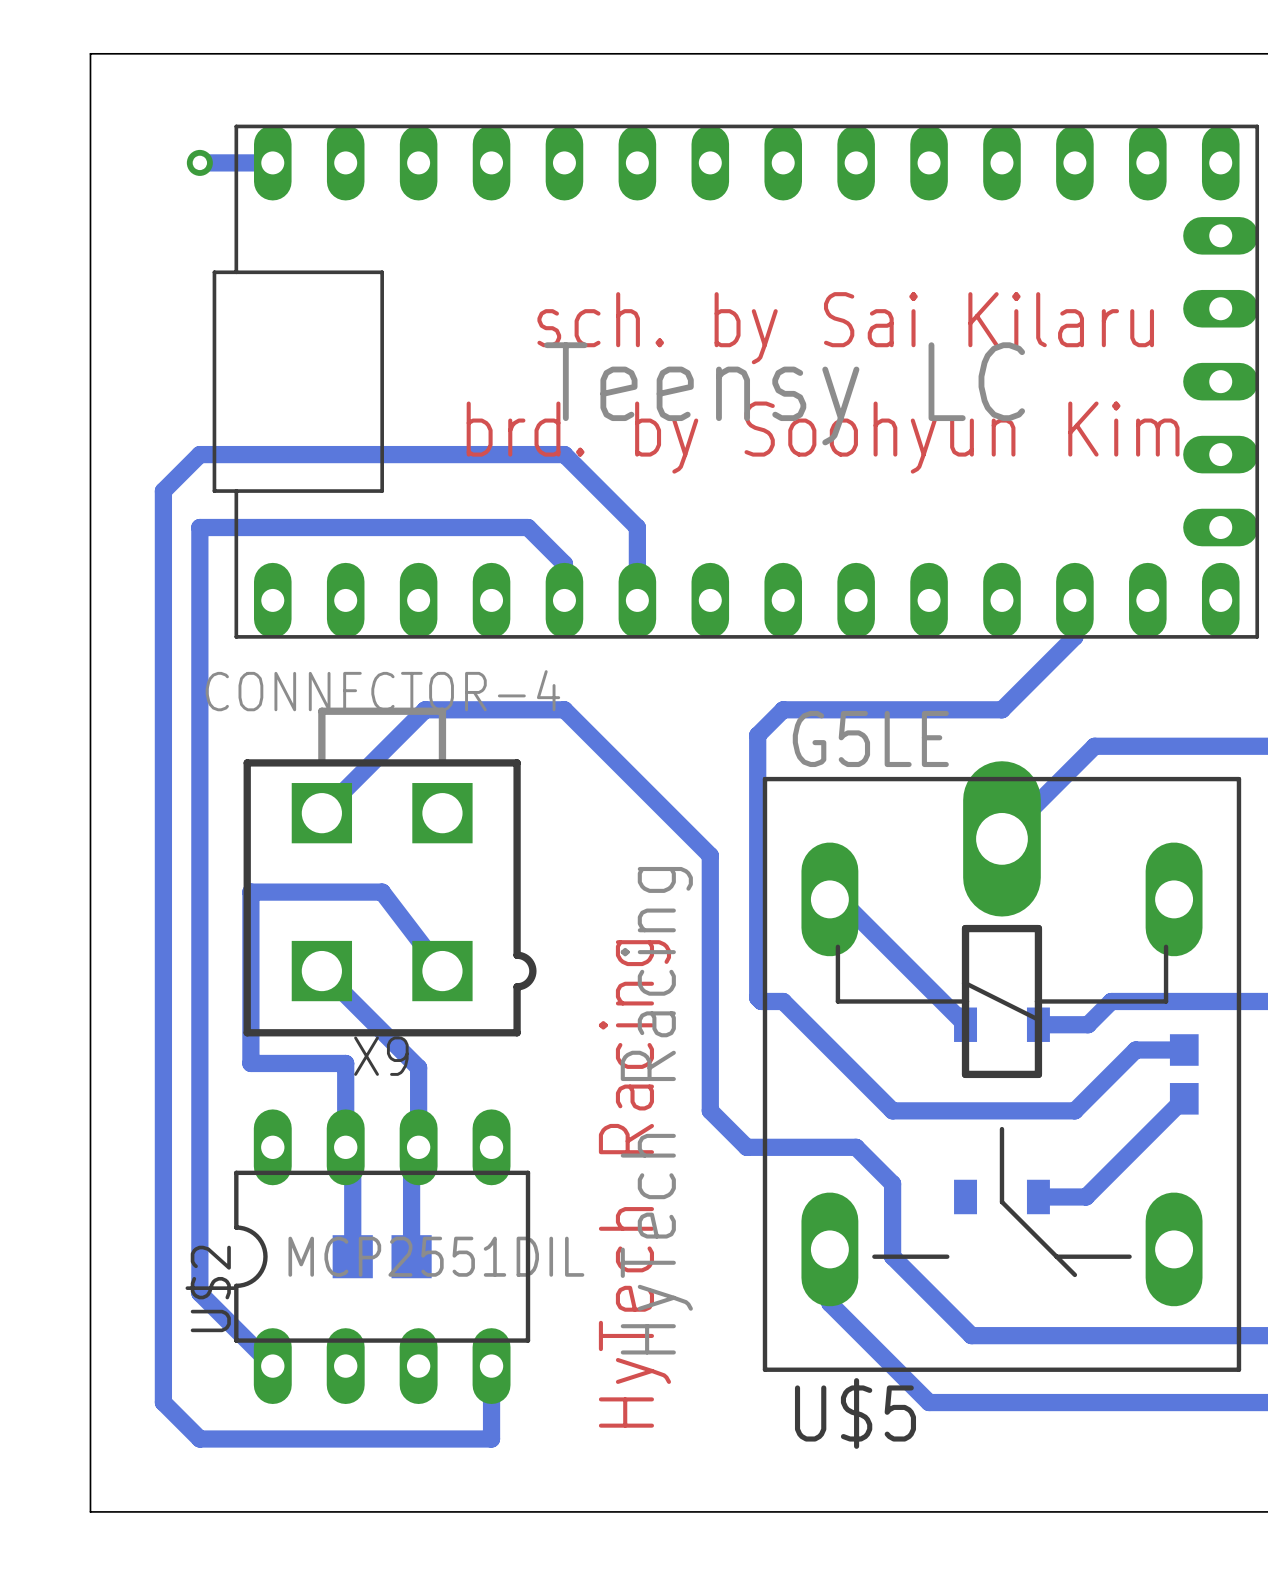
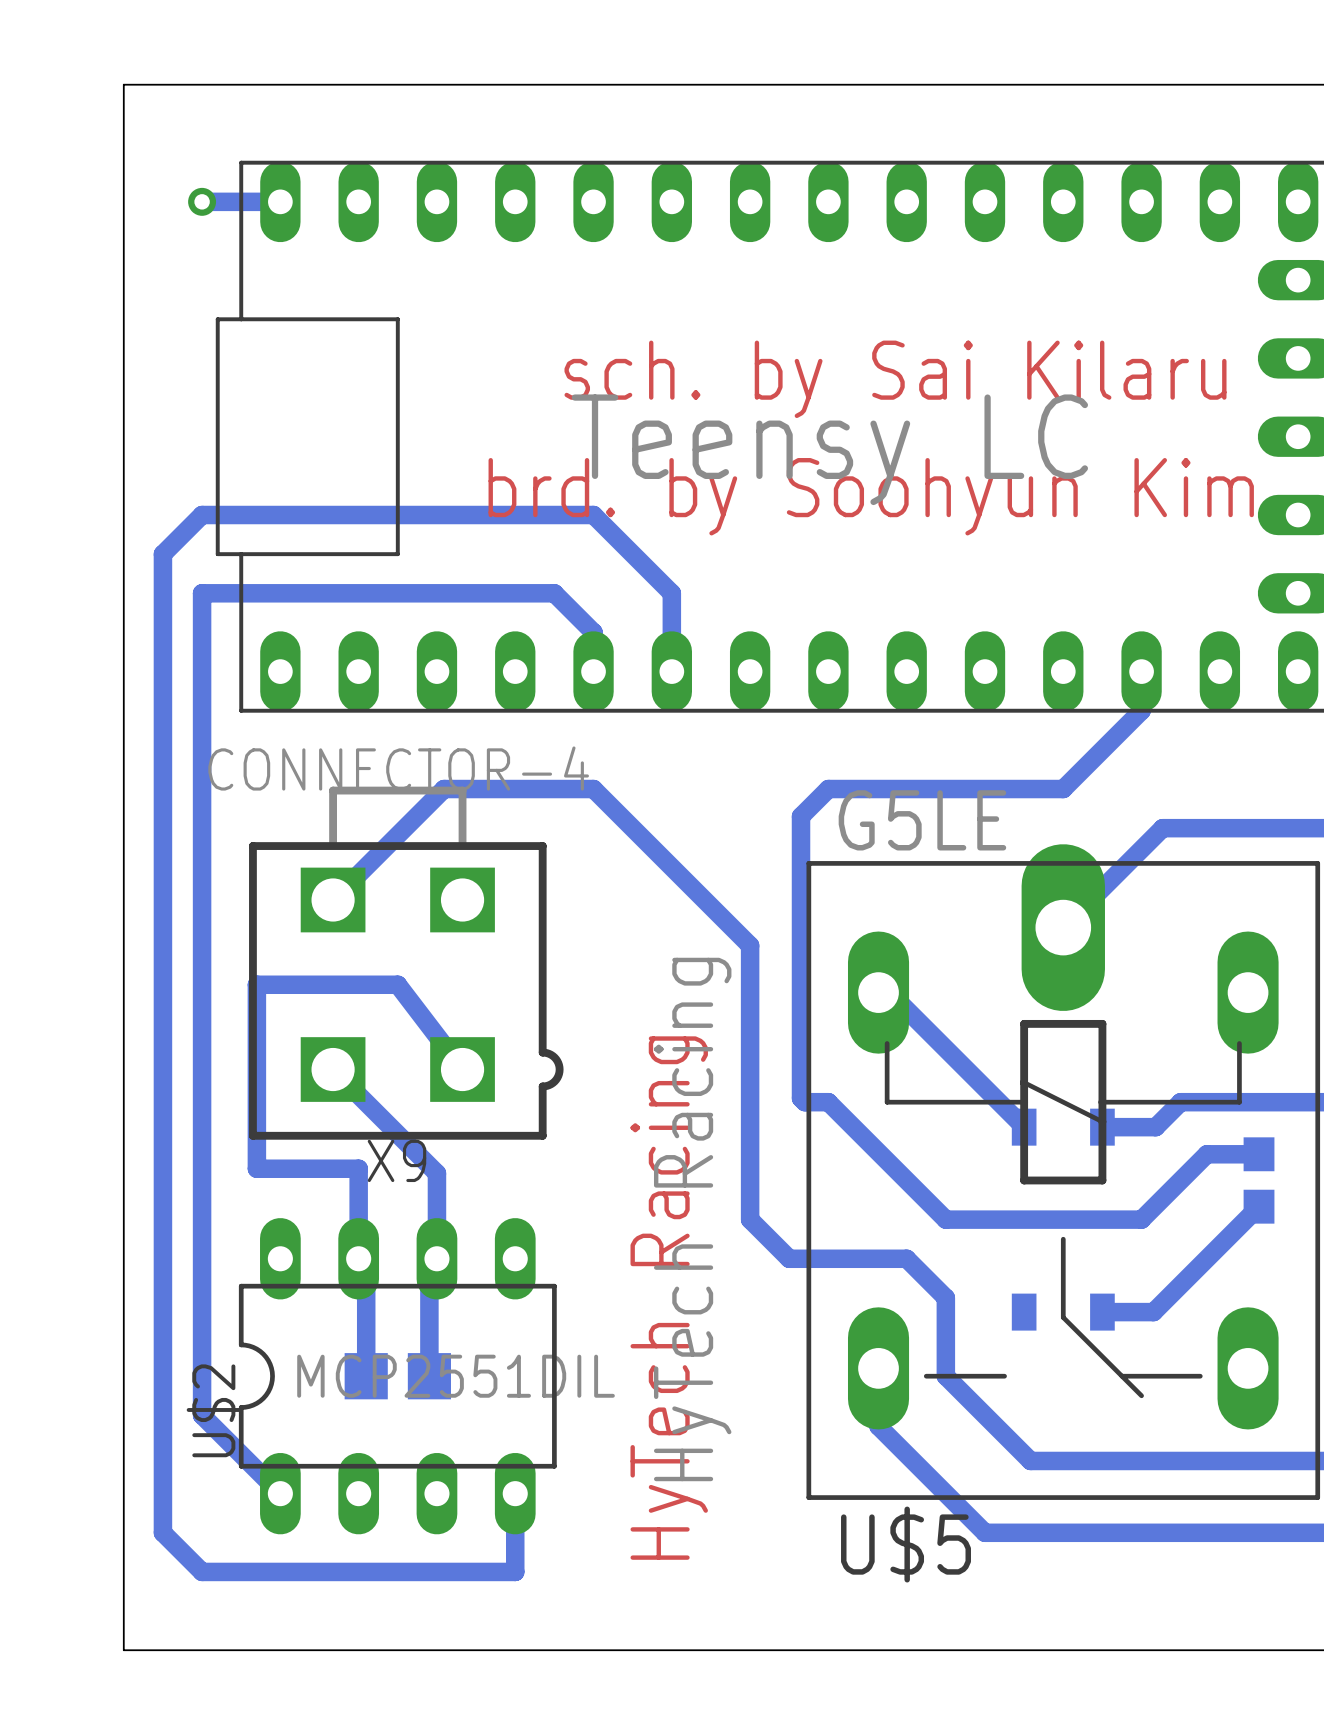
board edge: (126, 53) (90, 53) (90, 1511) (126, 1511) -> (123, 84) (123, 1650)

